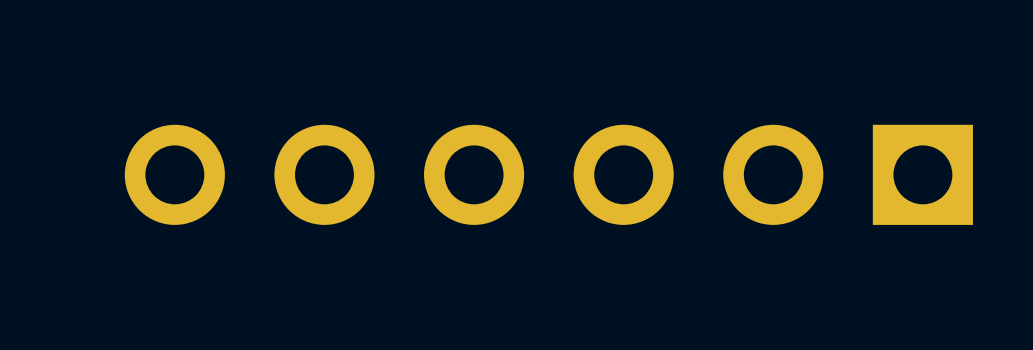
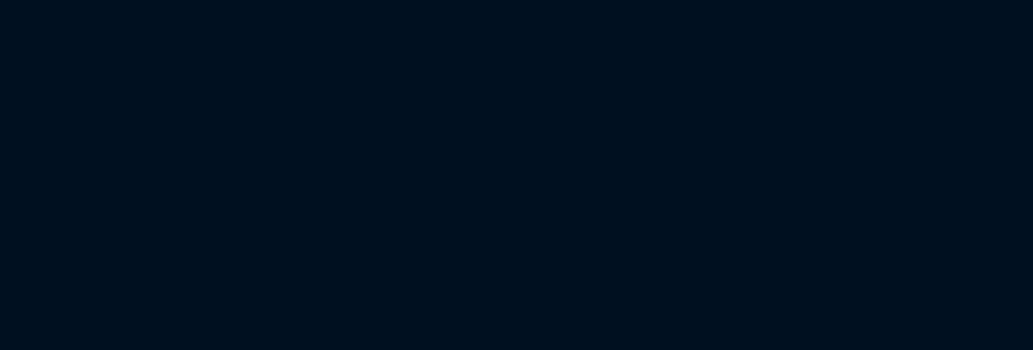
part: (548, 174) -> none

